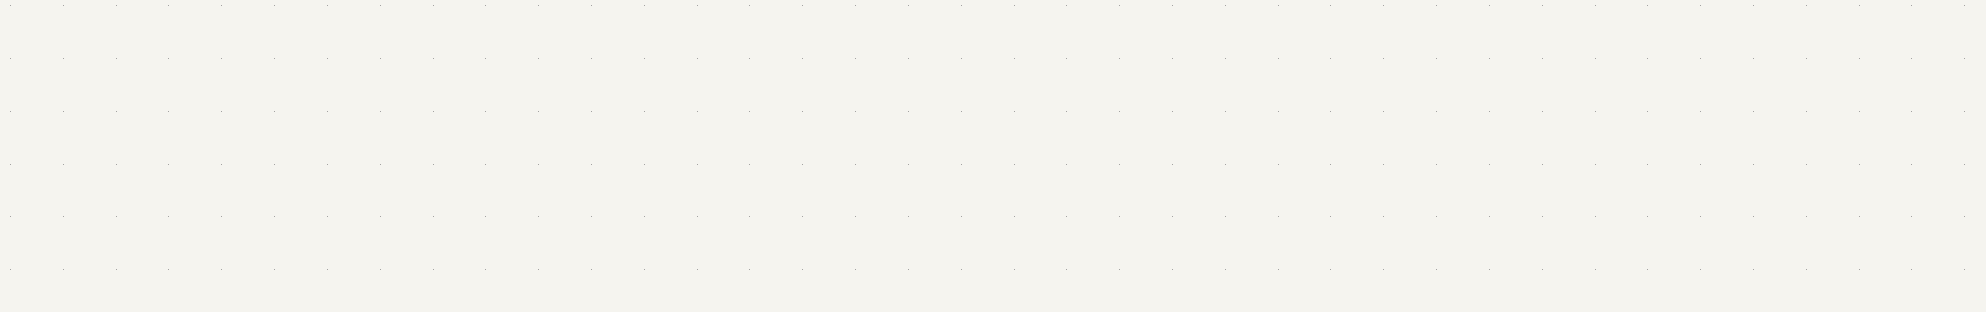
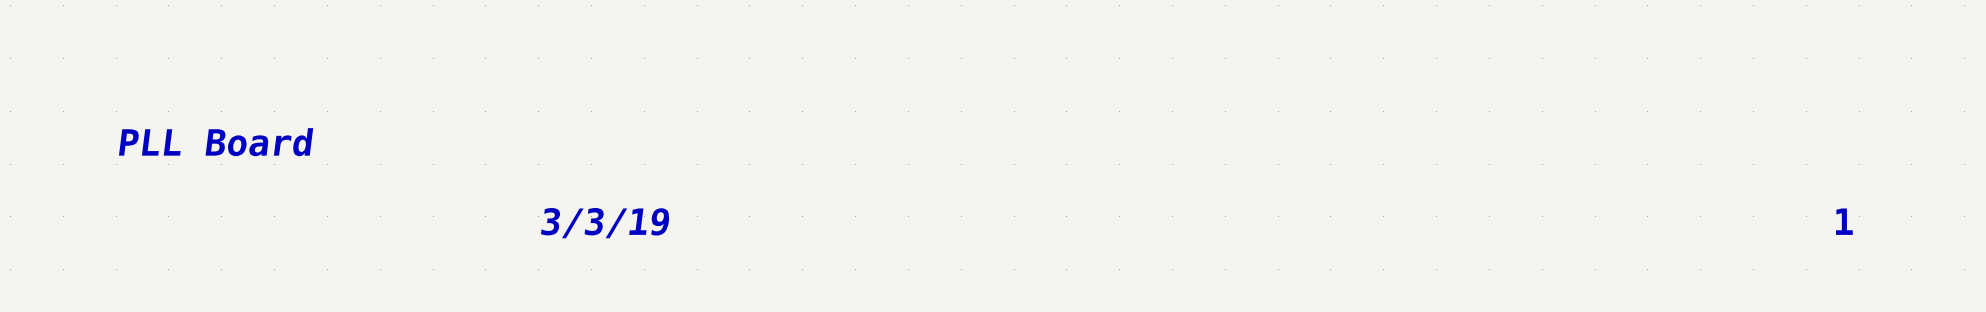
text: none -> PLL Board (216, 142)
text: none -> 1 (1844, 221)
text: none -> 3/3/19 (605, 223)

